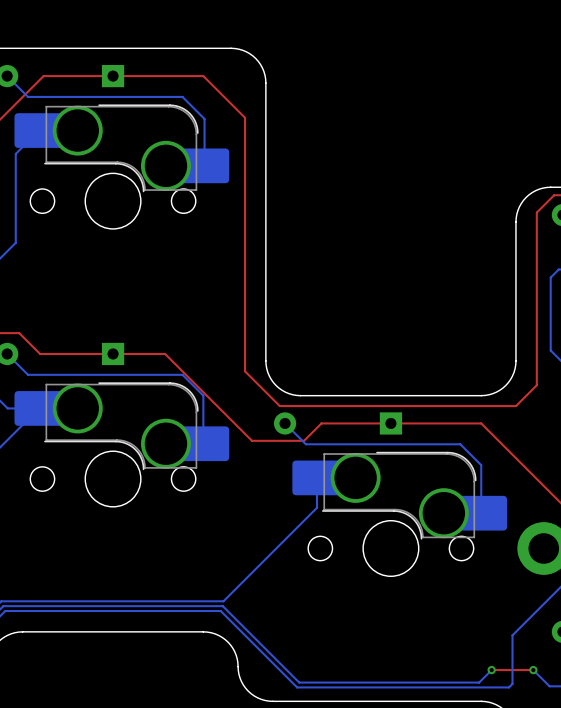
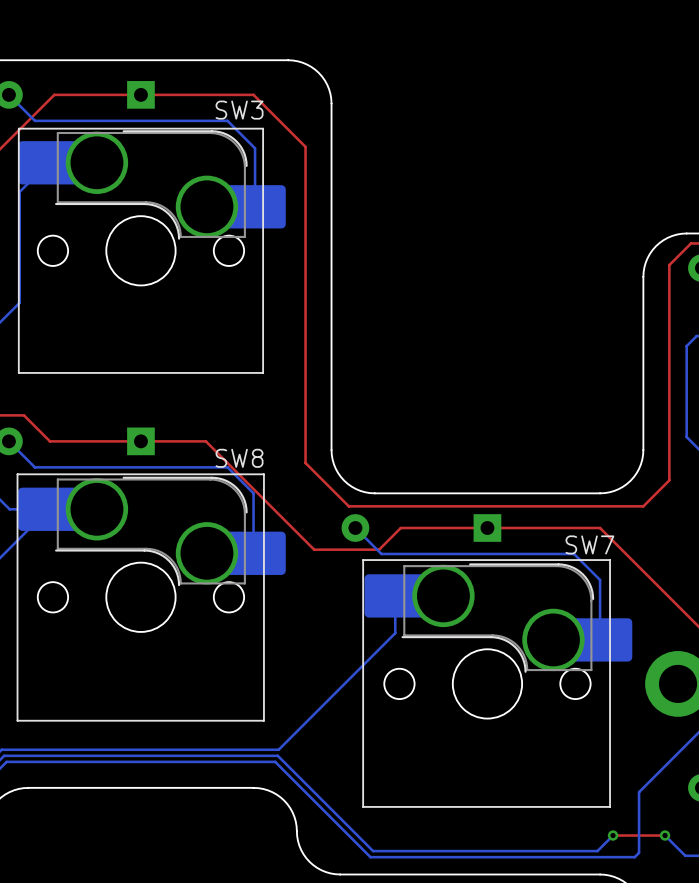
text: none -> SW3 (239, 110)
line: none -> (263, 128) (18, 128) (18, 372) (263, 372) (263, 128)
text: none -> SW8 (239, 458)
line: none -> (263, 474) (17, 474) (17, 720) (263, 720) (263, 474)
text: none -> SW7 (589, 544)
line: none -> (610, 560) (363, 560) (363, 806) (610, 806) (610, 560)

